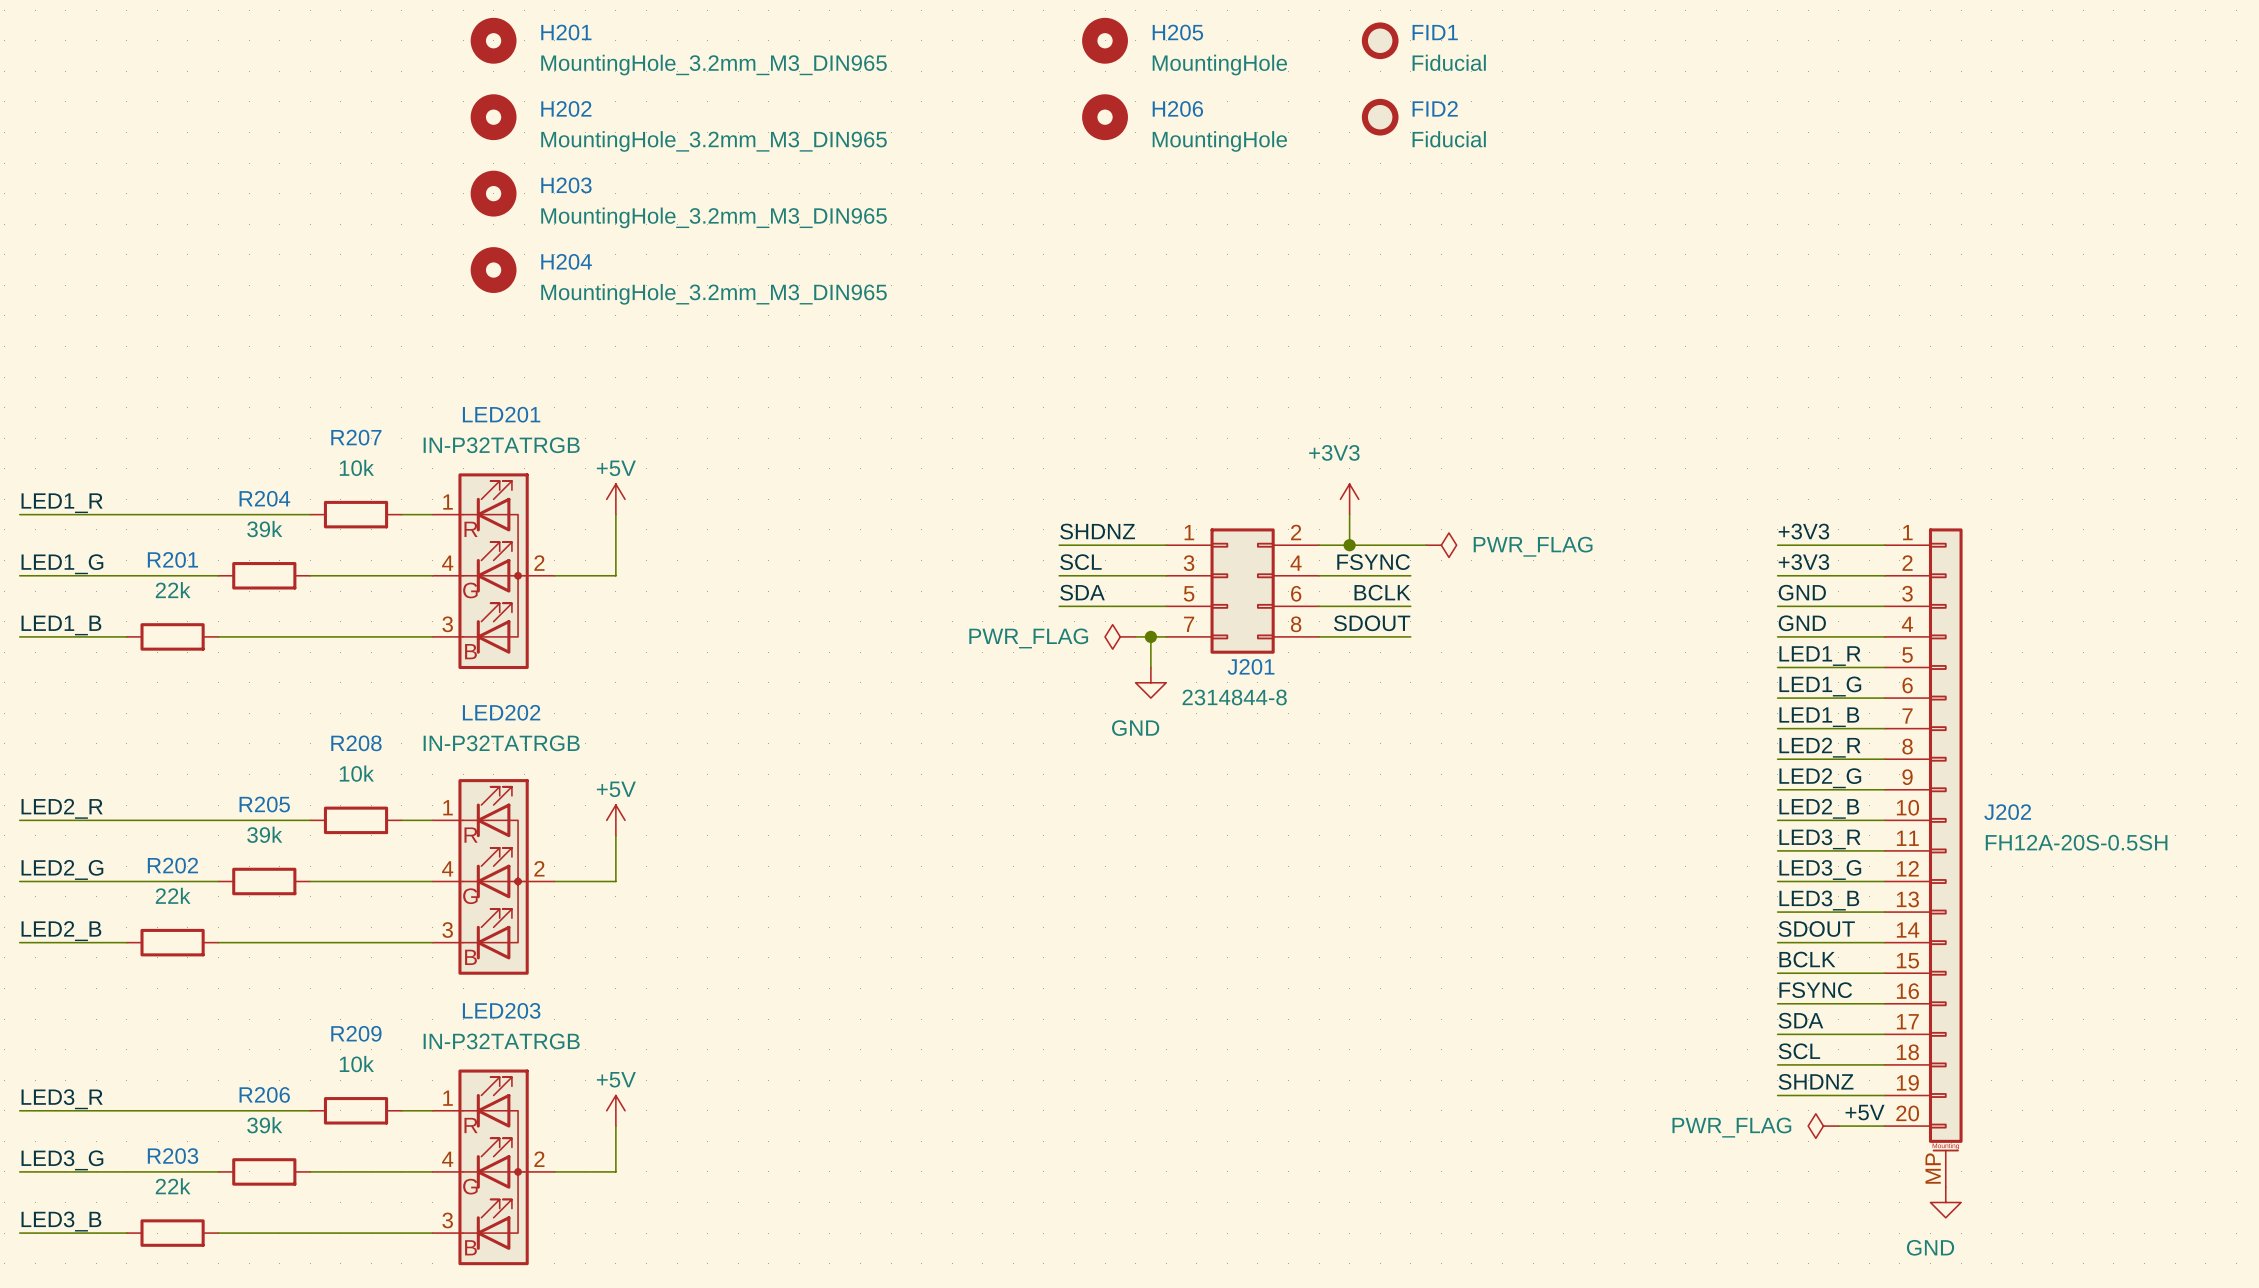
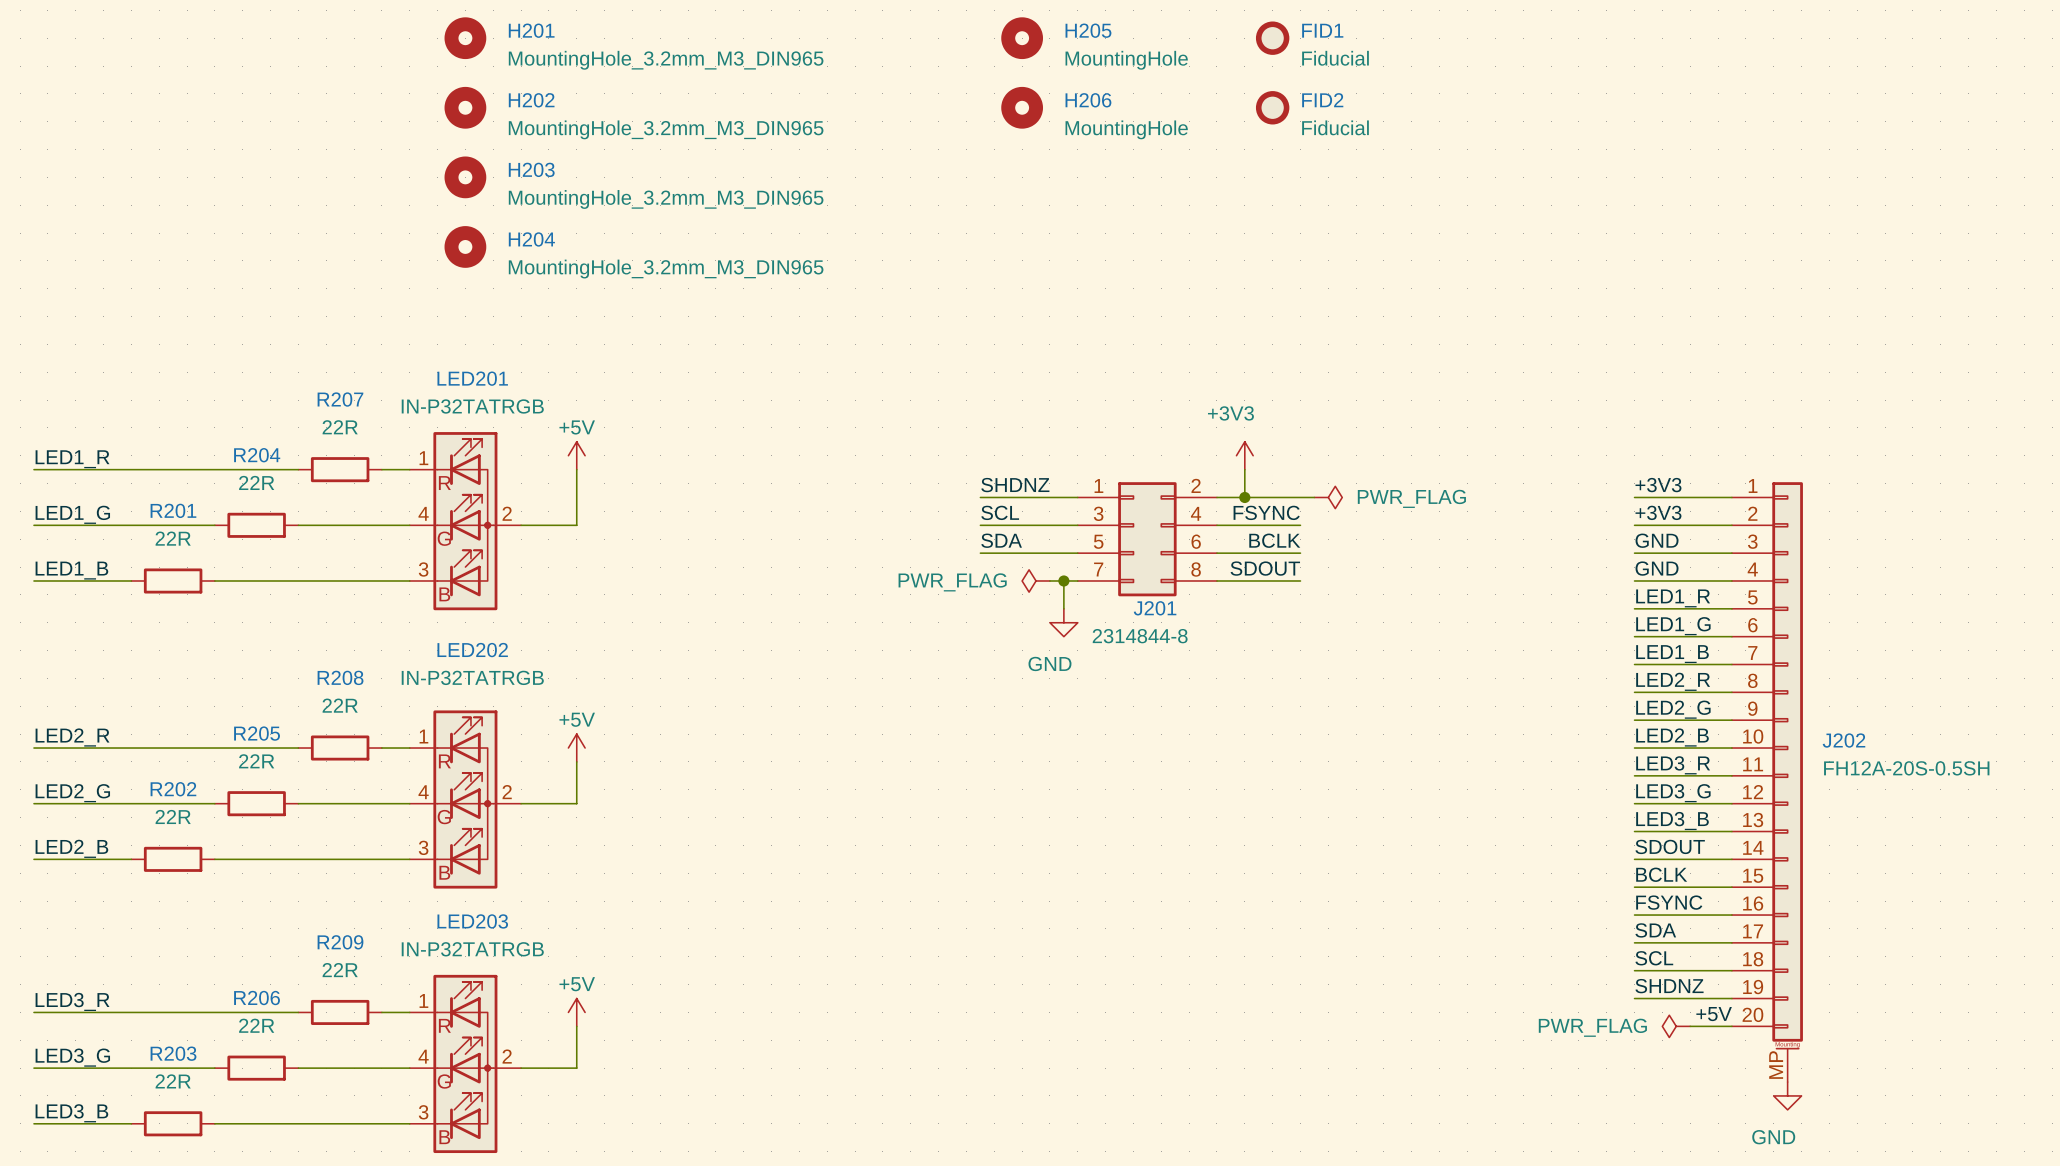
R207 value: 10k (356, 467) -> 22R (340, 427)
R204 value: 39k (264, 529) -> 22R (256, 482)
R201 value: 22k (173, 590) -> 22R (173, 538)
R208 value: 10k (356, 773) -> 22R (340, 705)
R205 value: 39k (264, 834) -> 22R (256, 761)
R202 value: 22k (173, 895) -> 22R (173, 816)
R209 value: 10k (356, 1064) -> 22R (340, 970)
R206 value: 39k (264, 1125) -> 22R (256, 1025)
R203 value: 22k (173, 1186) -> 22R (173, 1081)

